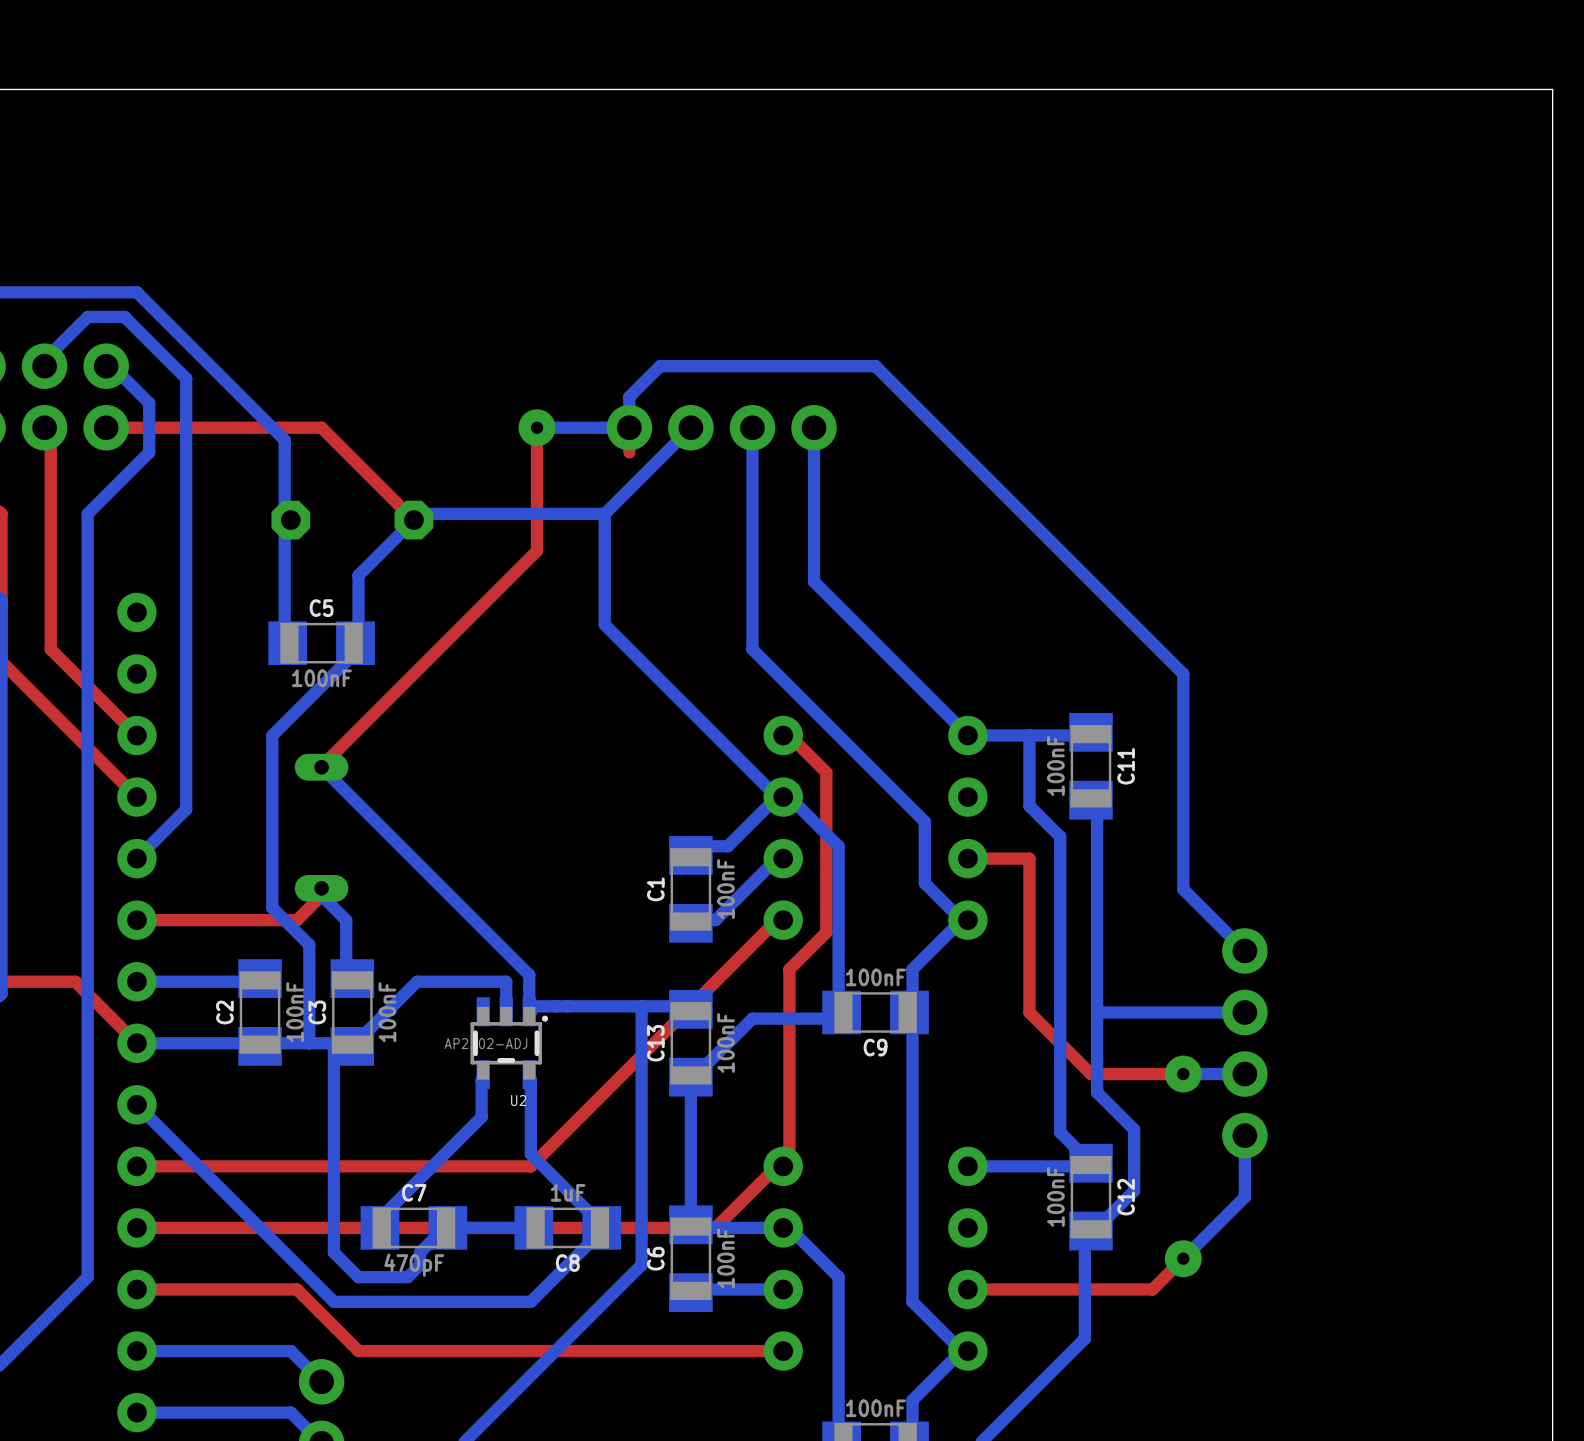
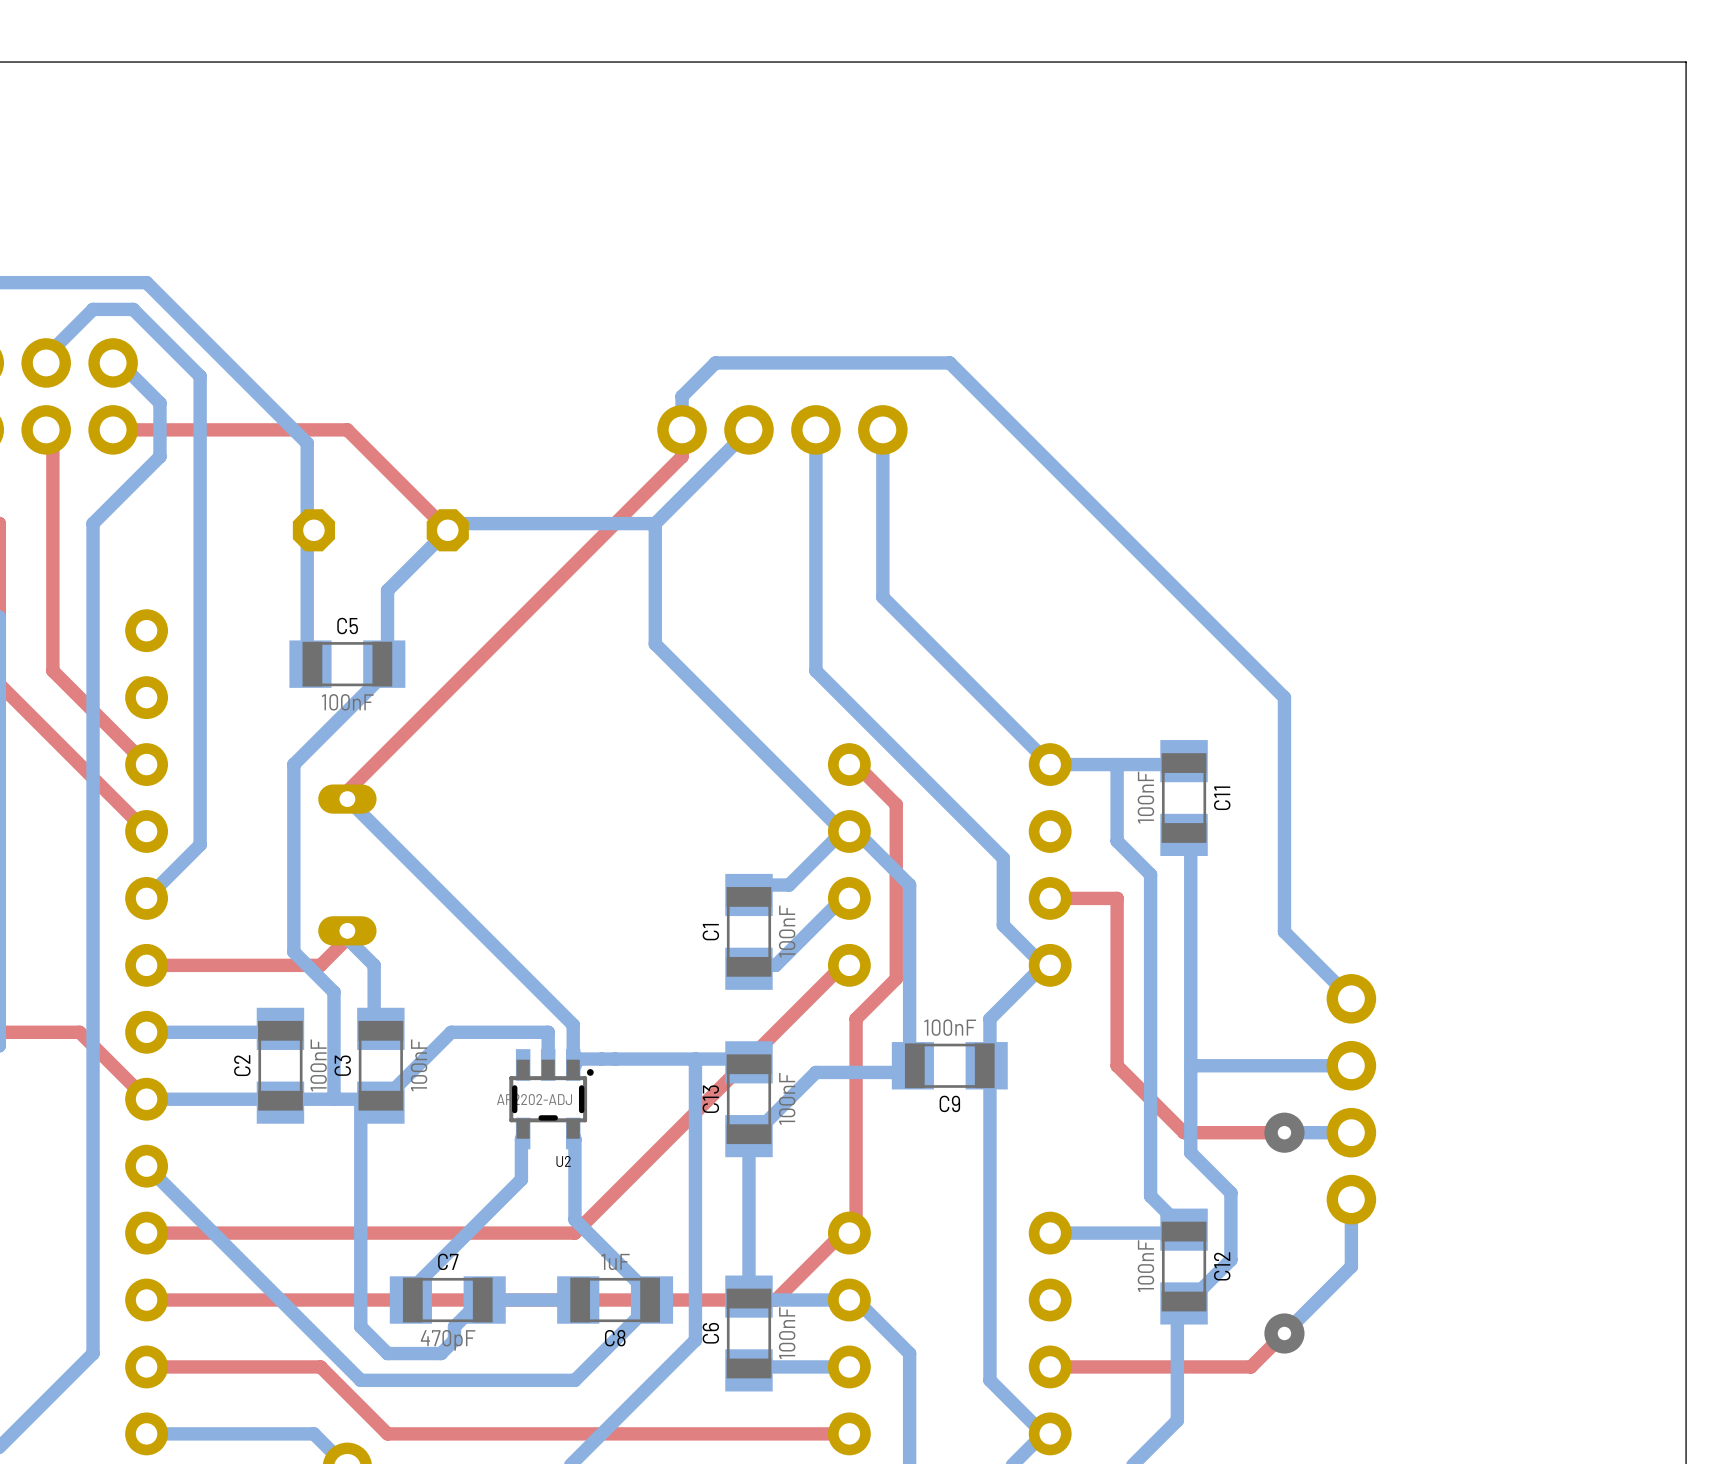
top track: (537, 427) (537, 550) (321, 766) -> none
via: (537, 427) -> none
bottom track: (629, 427) (537, 427) -> none
top track: none -> (682, 456) (347, 791)

